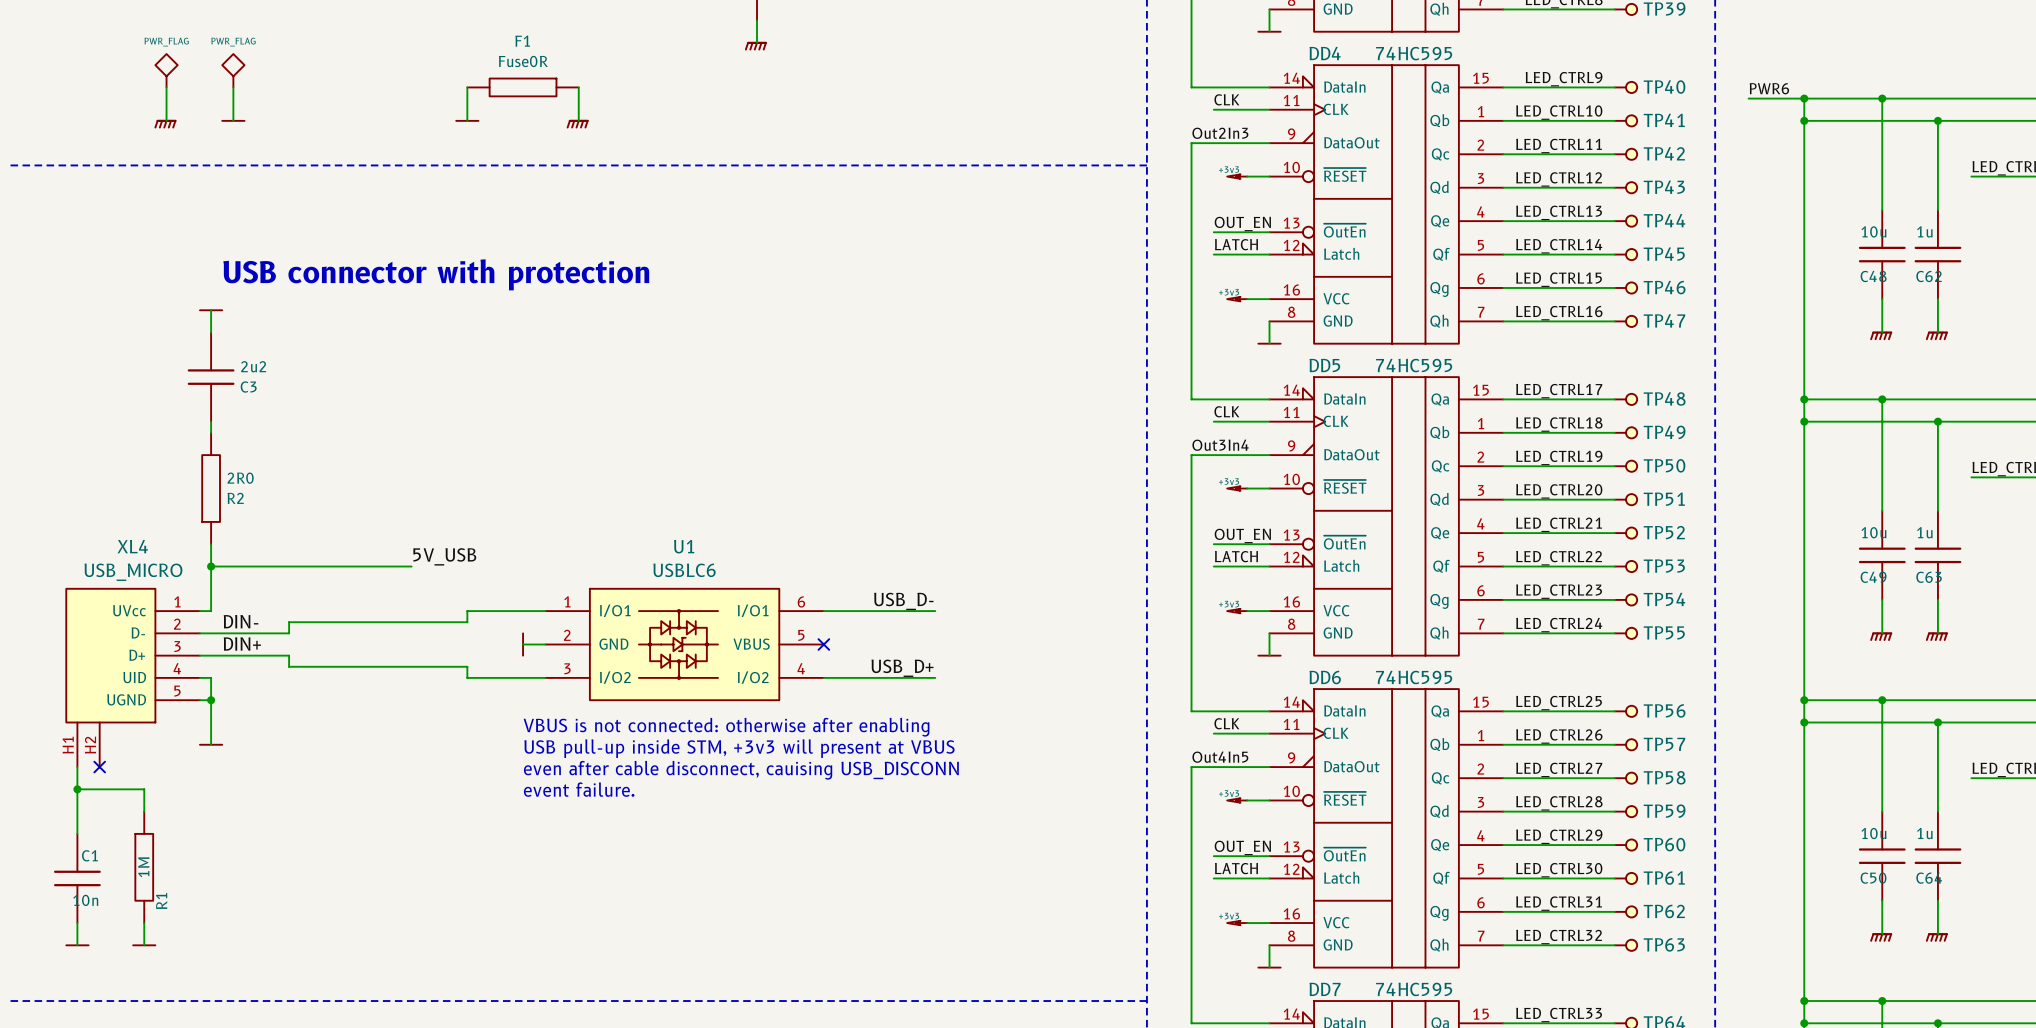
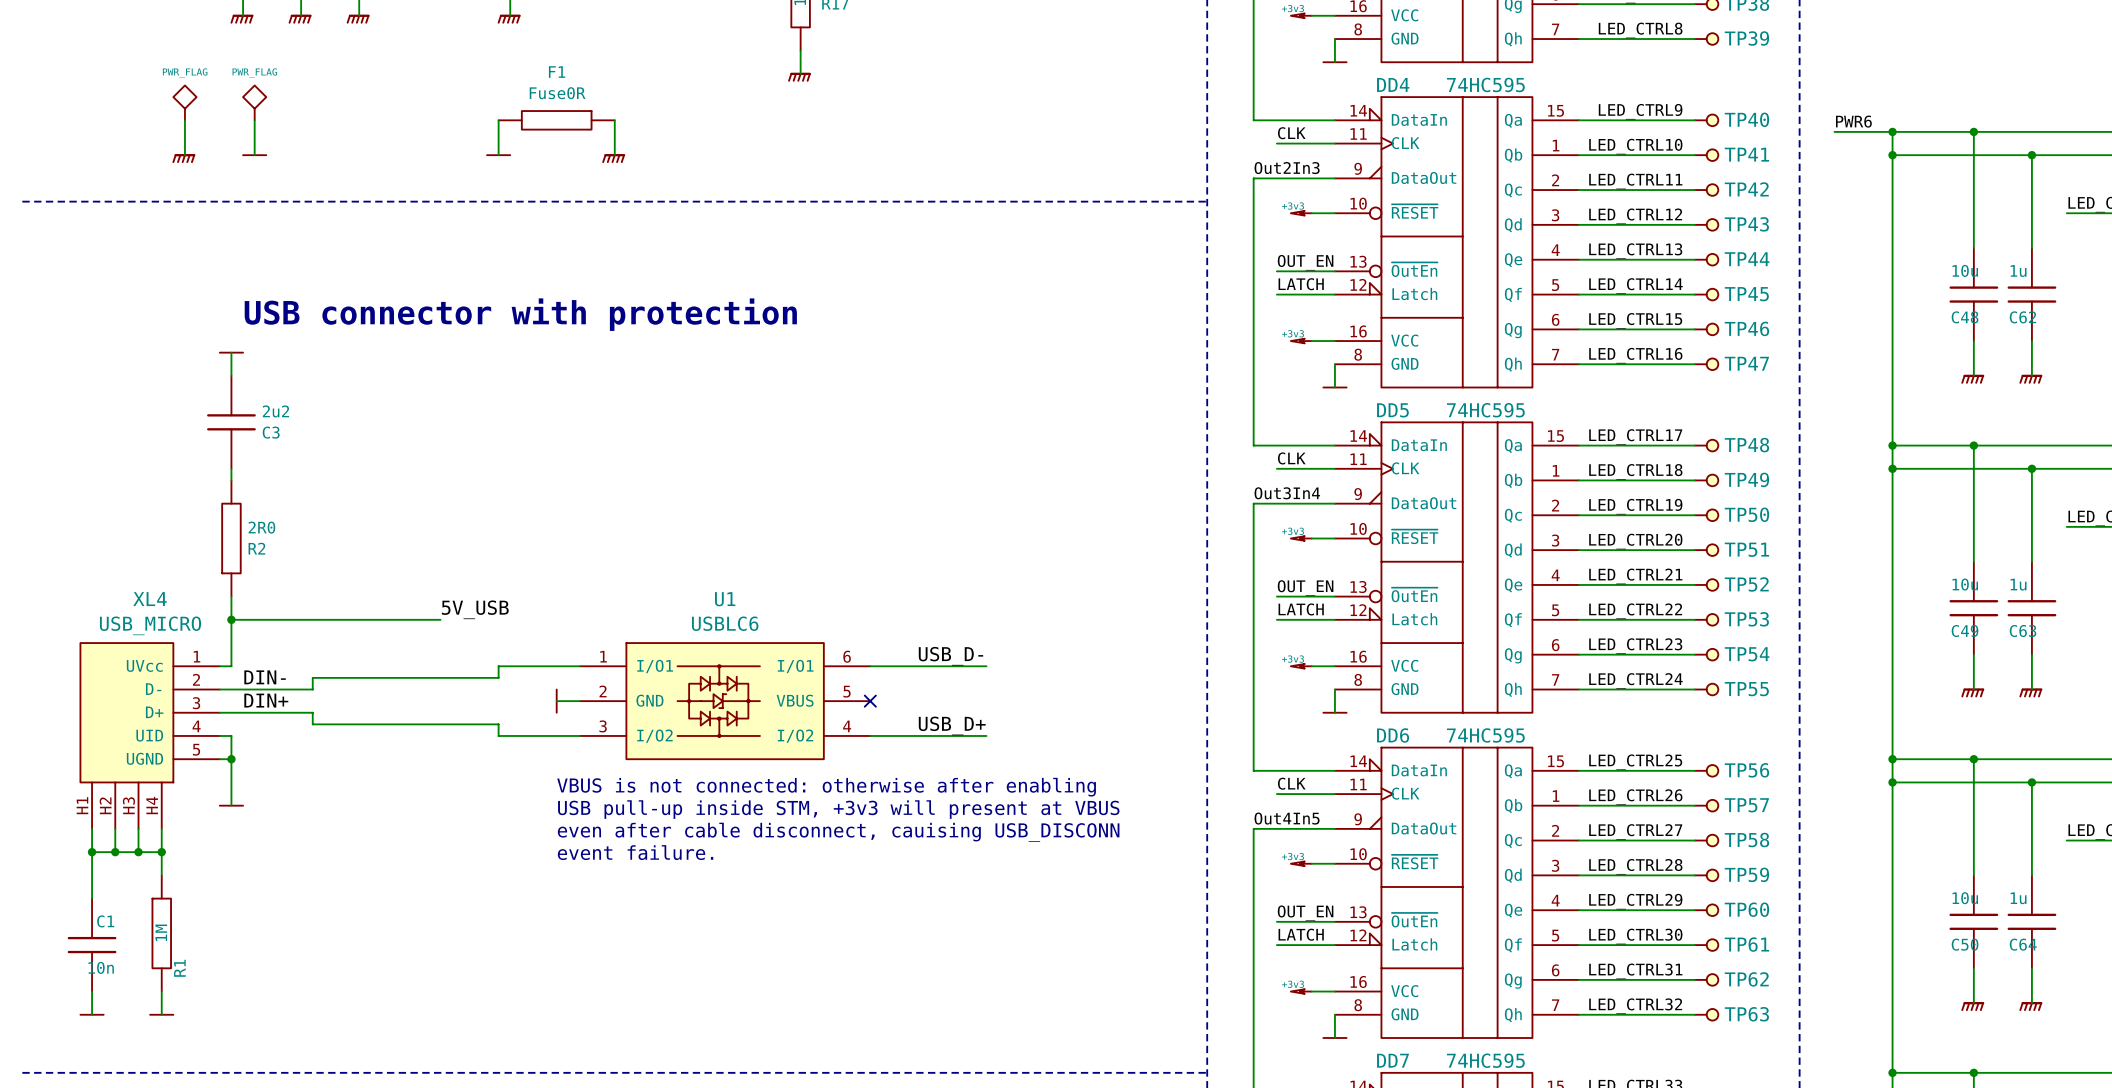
XL4 symbol: [66, 588, 200, 768] -> [80, 643, 220, 829]
wire: none -> (115, 828) (115, 852)
no-connect mark: (99, 767) -> none
wire: none -> (138, 828) (138, 852)
wire: none -> (161, 828) (161, 852)
junction: none -> (115, 852)
junction: none -> (138, 852)
junction: none -> (161, 852)

